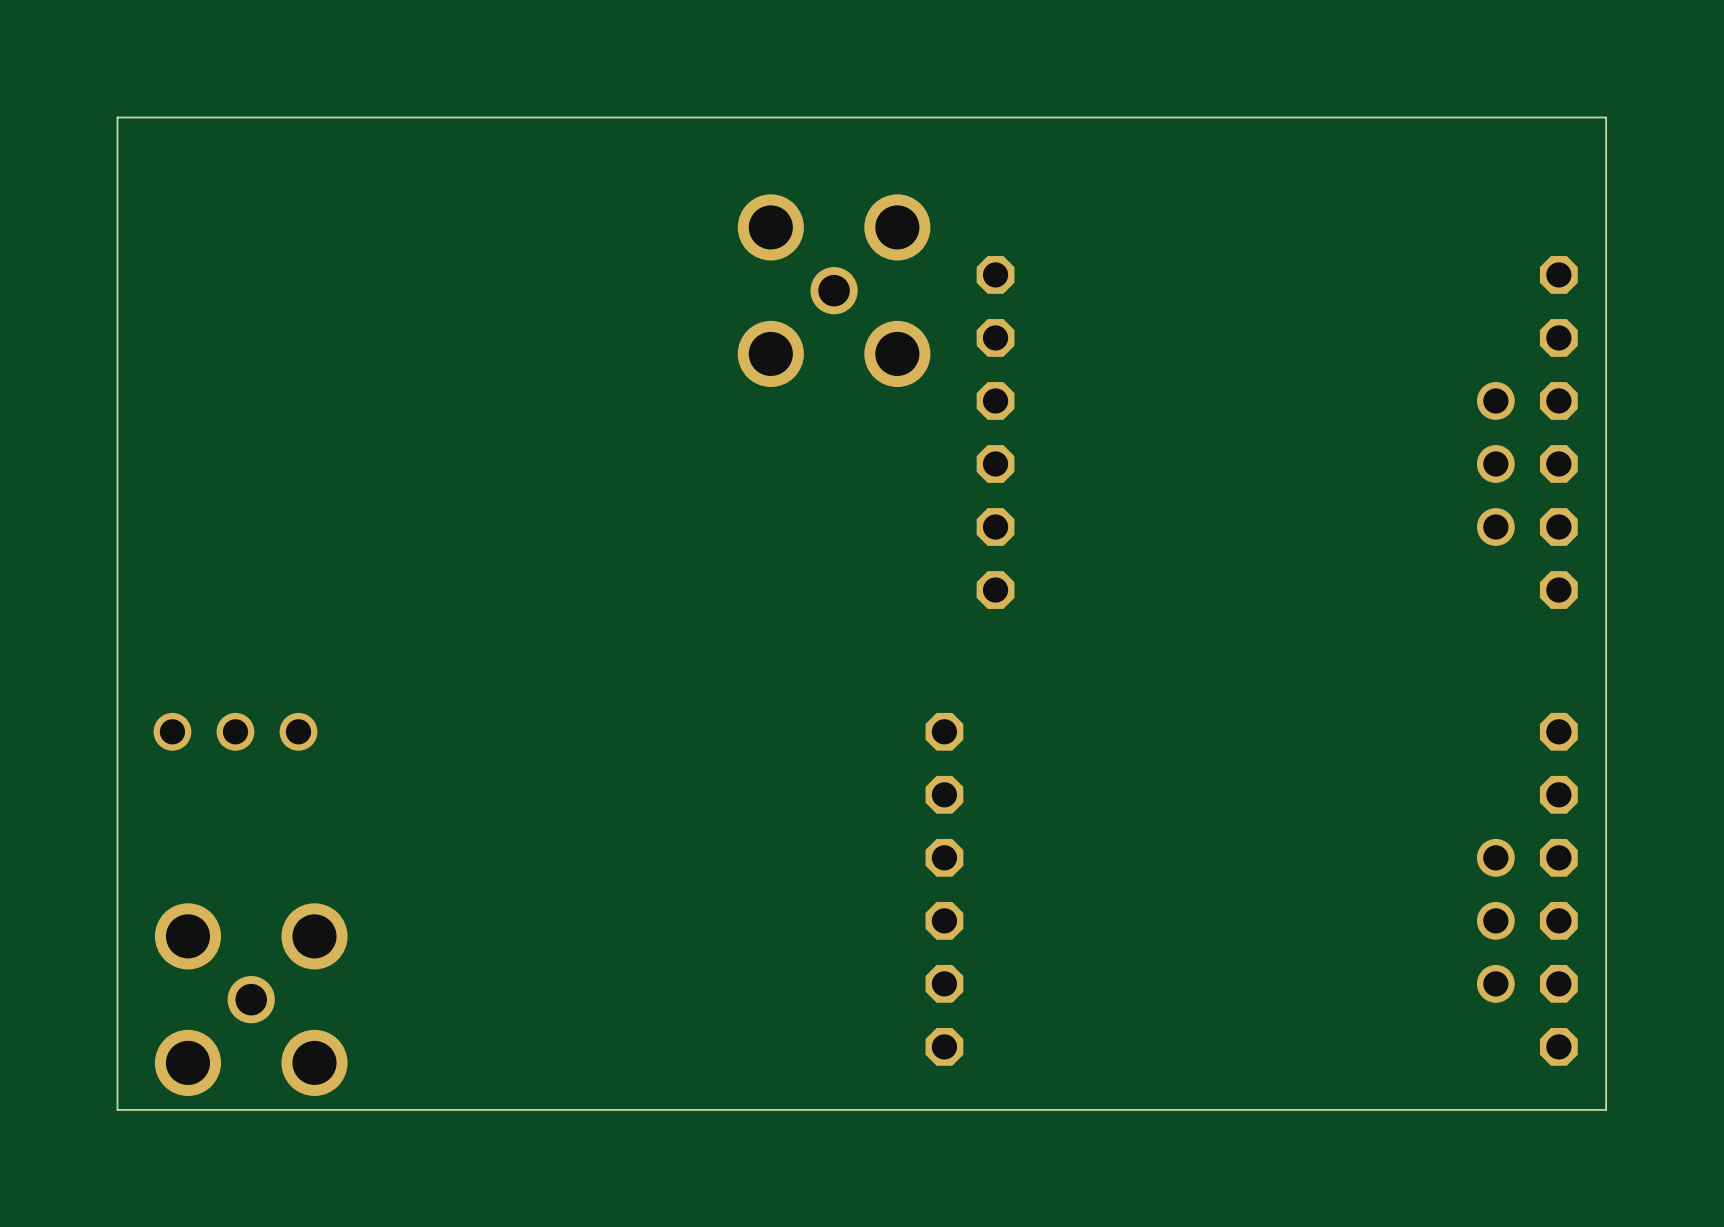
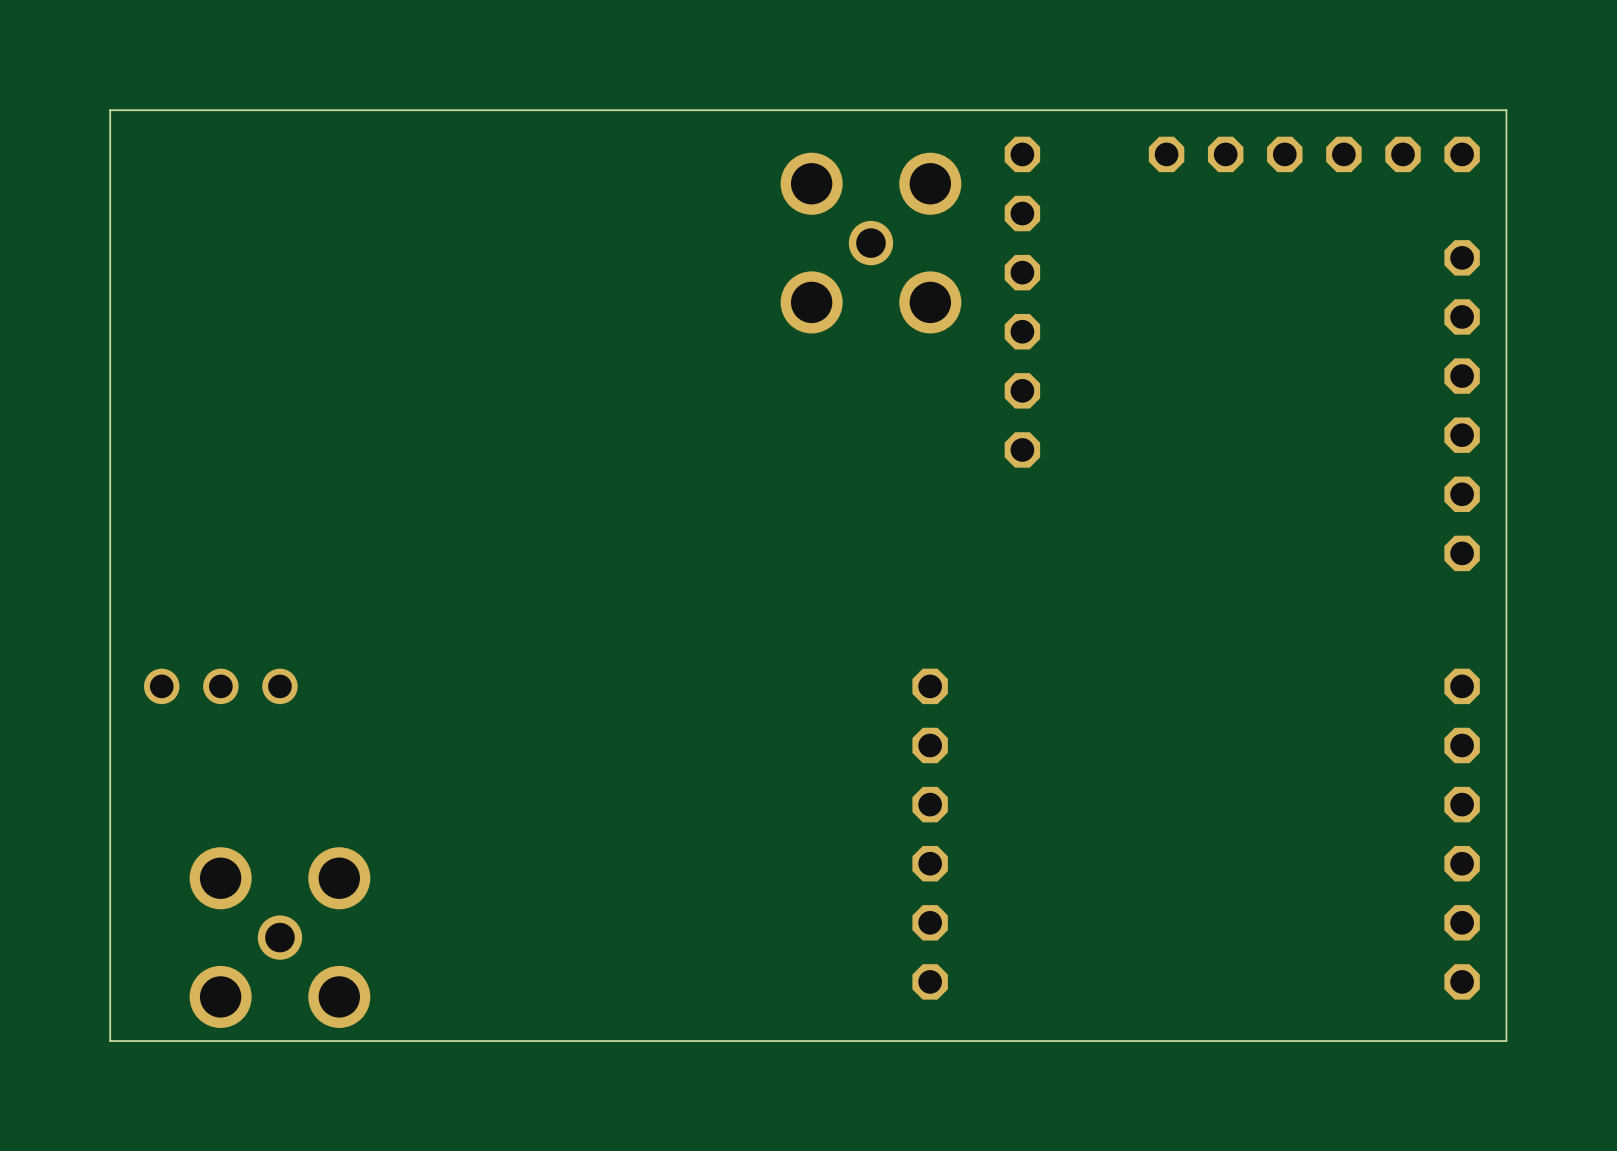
part: none -> (1314, 154)
part position: (834, 290) -> (870, 243)
part position: (995, 432) -> (1022, 302)
part: (1495, 463) -> none
part position: (944, 889) -> (930, 834)
part: (1495, 920) -> none
part position: (251, 999) -> (279, 937)

